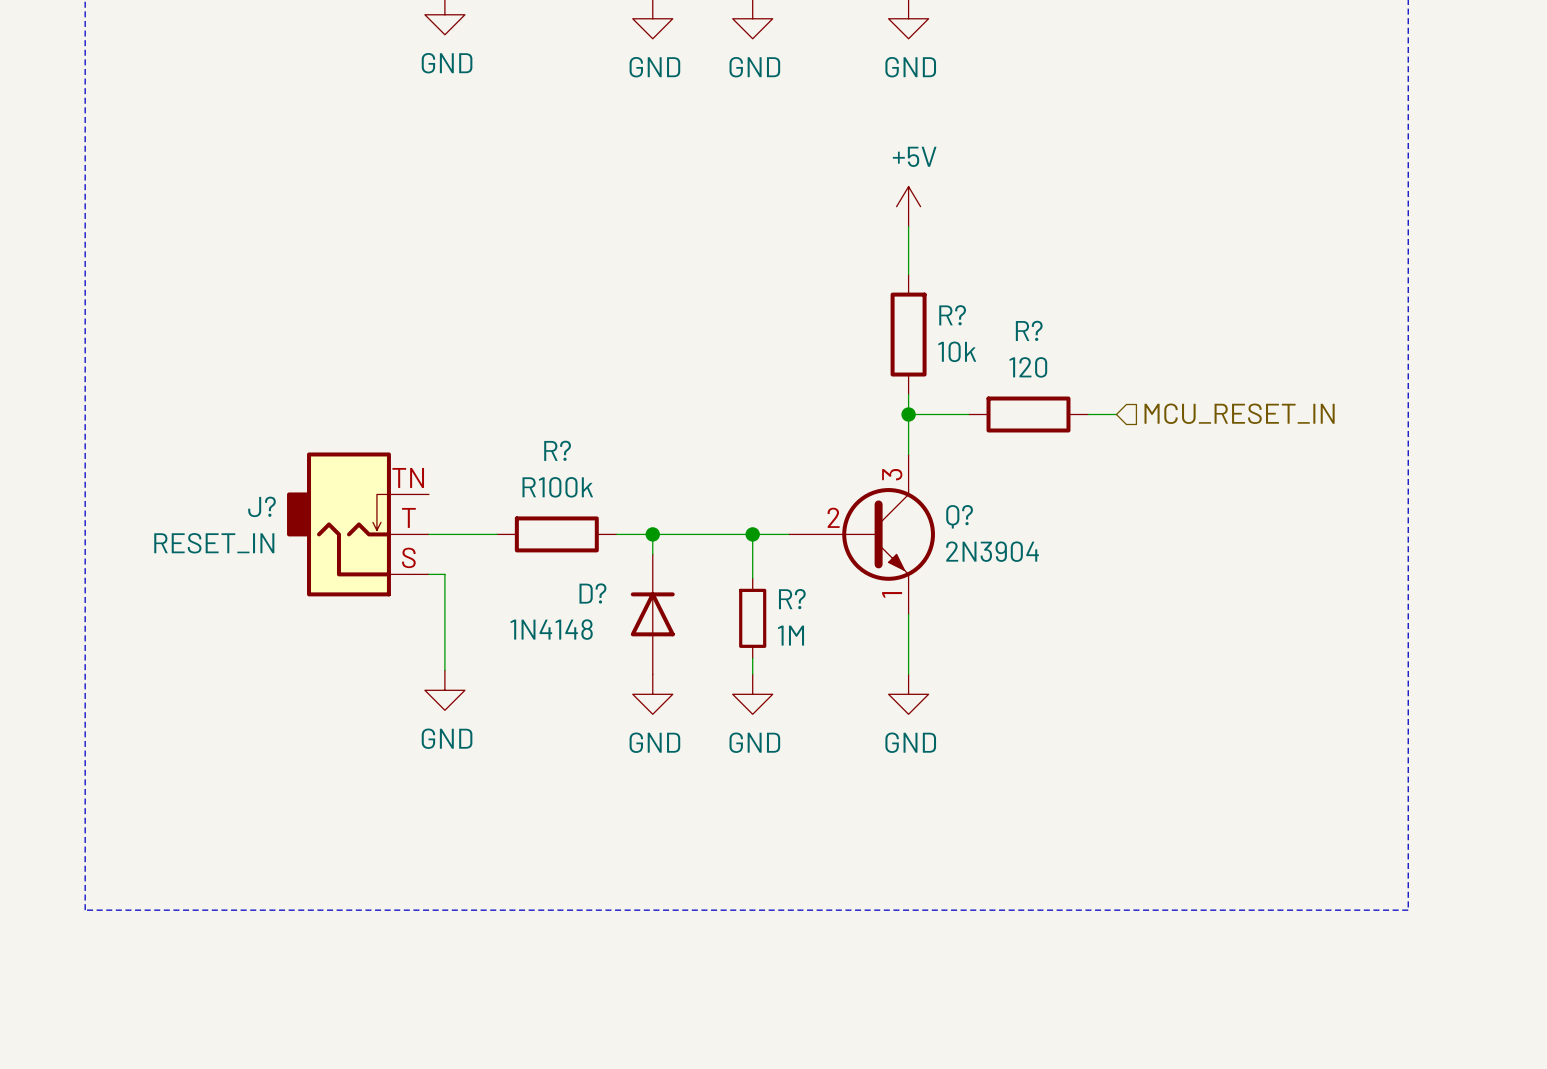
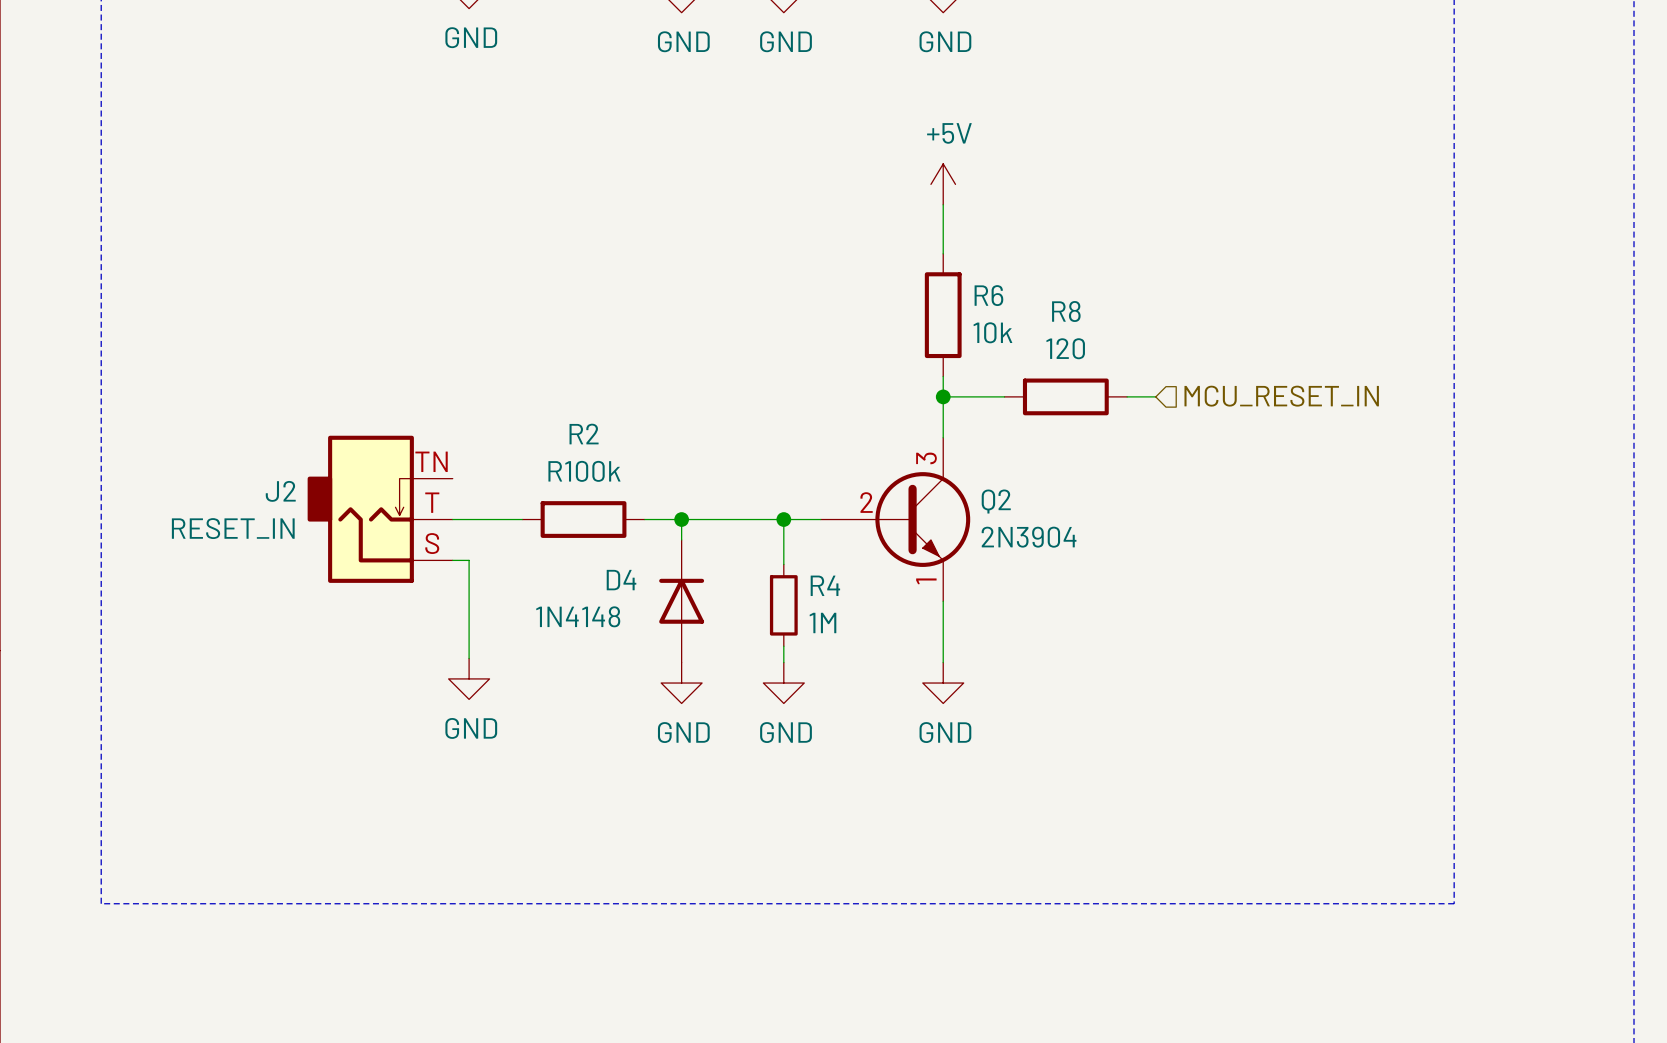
R? name: R? (952, 315) -> R6 (988, 295)
R? name: R? (1029, 330) -> R8 (1066, 311)
R? name: R? (557, 450) -> R2 (584, 434)
J? name: J? (262, 506) -> J2 (280, 491)
Q? name: Q? (959, 516) -> Q2 (996, 501)
D? name: D? (592, 593) -> D4 (621, 580)
R? name: R? (792, 599) -> R4 (825, 585)

